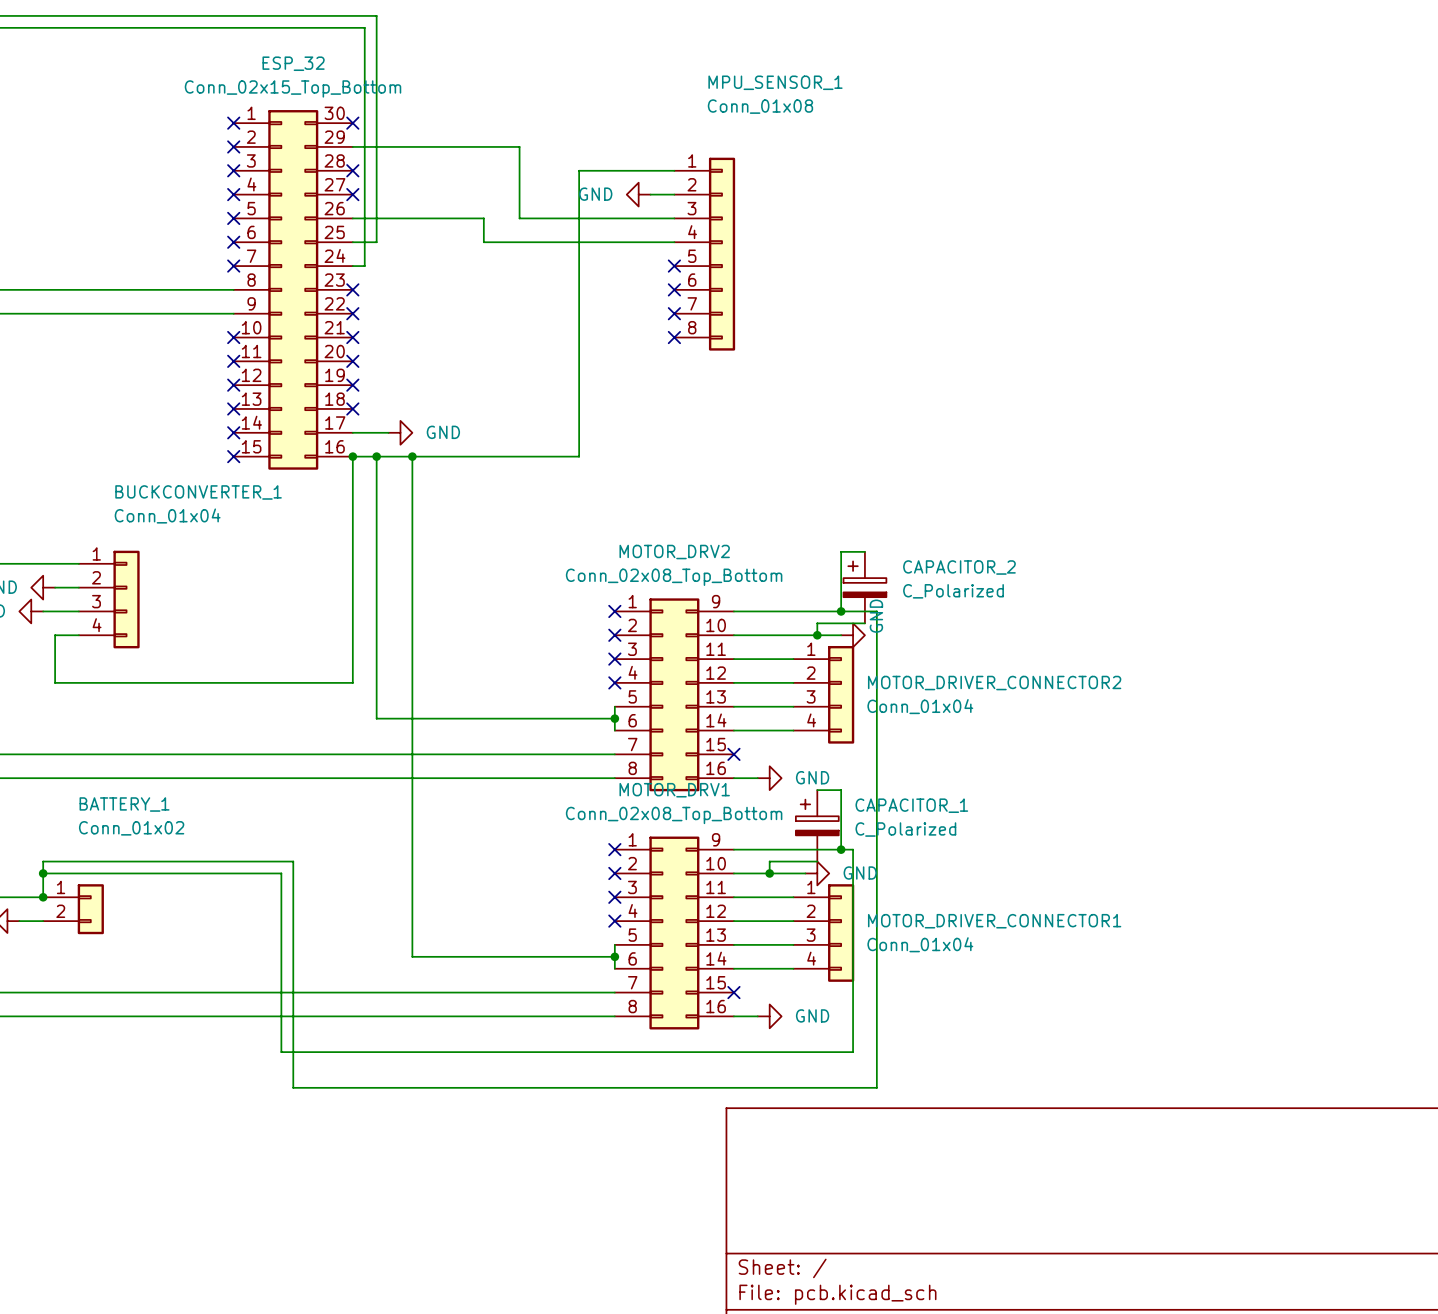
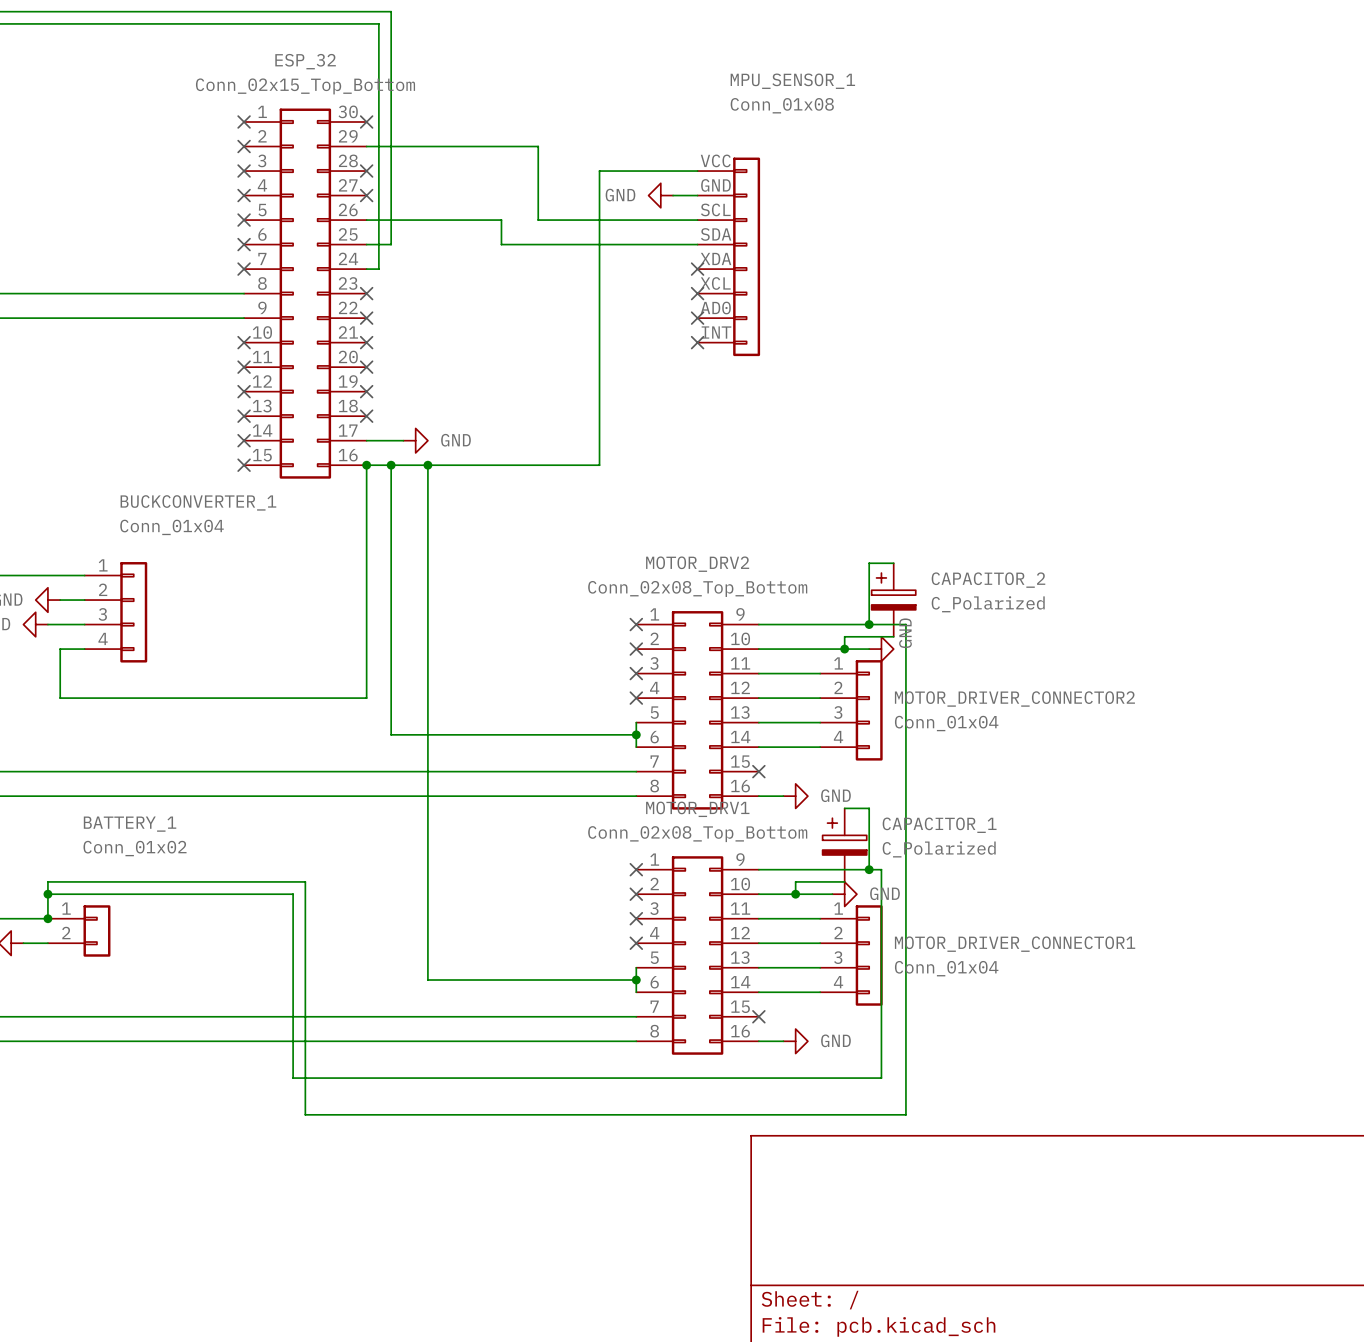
MPU_SENSOR_1 pin number: 1 (692, 160) -> VCC (715, 160)
MPU_SENSOR_1 pin number: 2 (691, 184) -> GND (715, 185)
MPU_SENSOR_1 pin number: 3 (691, 208) -> SCL (715, 209)
MPU_SENSOR_1 pin number: 4 (692, 232) -> SDA (716, 234)
MPU_SENSOR_1 pin number: 5 (692, 256) -> XDA (715, 258)
MPU_SENSOR_1 pin number: 6 (692, 280) -> XCL (715, 283)
MPU_SENSOR_1 pin number: 7 (692, 303) -> AD0 (715, 308)
MPU_SENSOR_1 pin number: 8 (692, 327) -> INT (716, 332)

